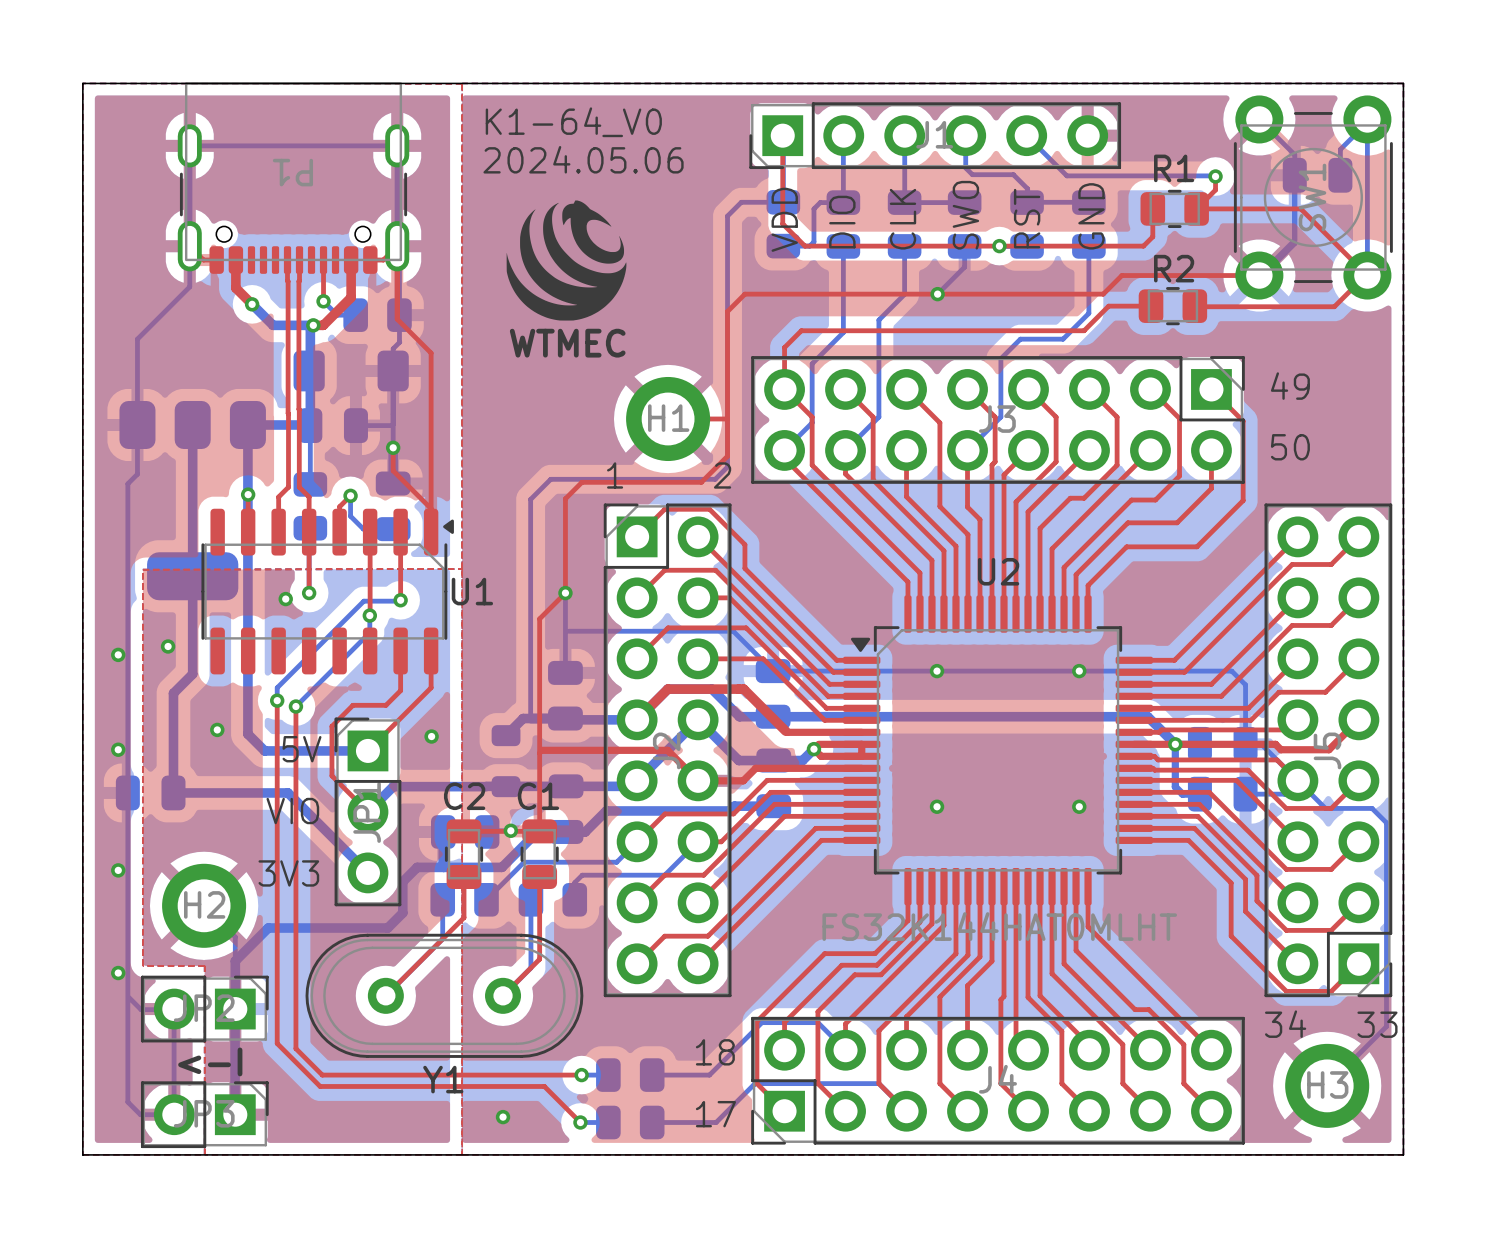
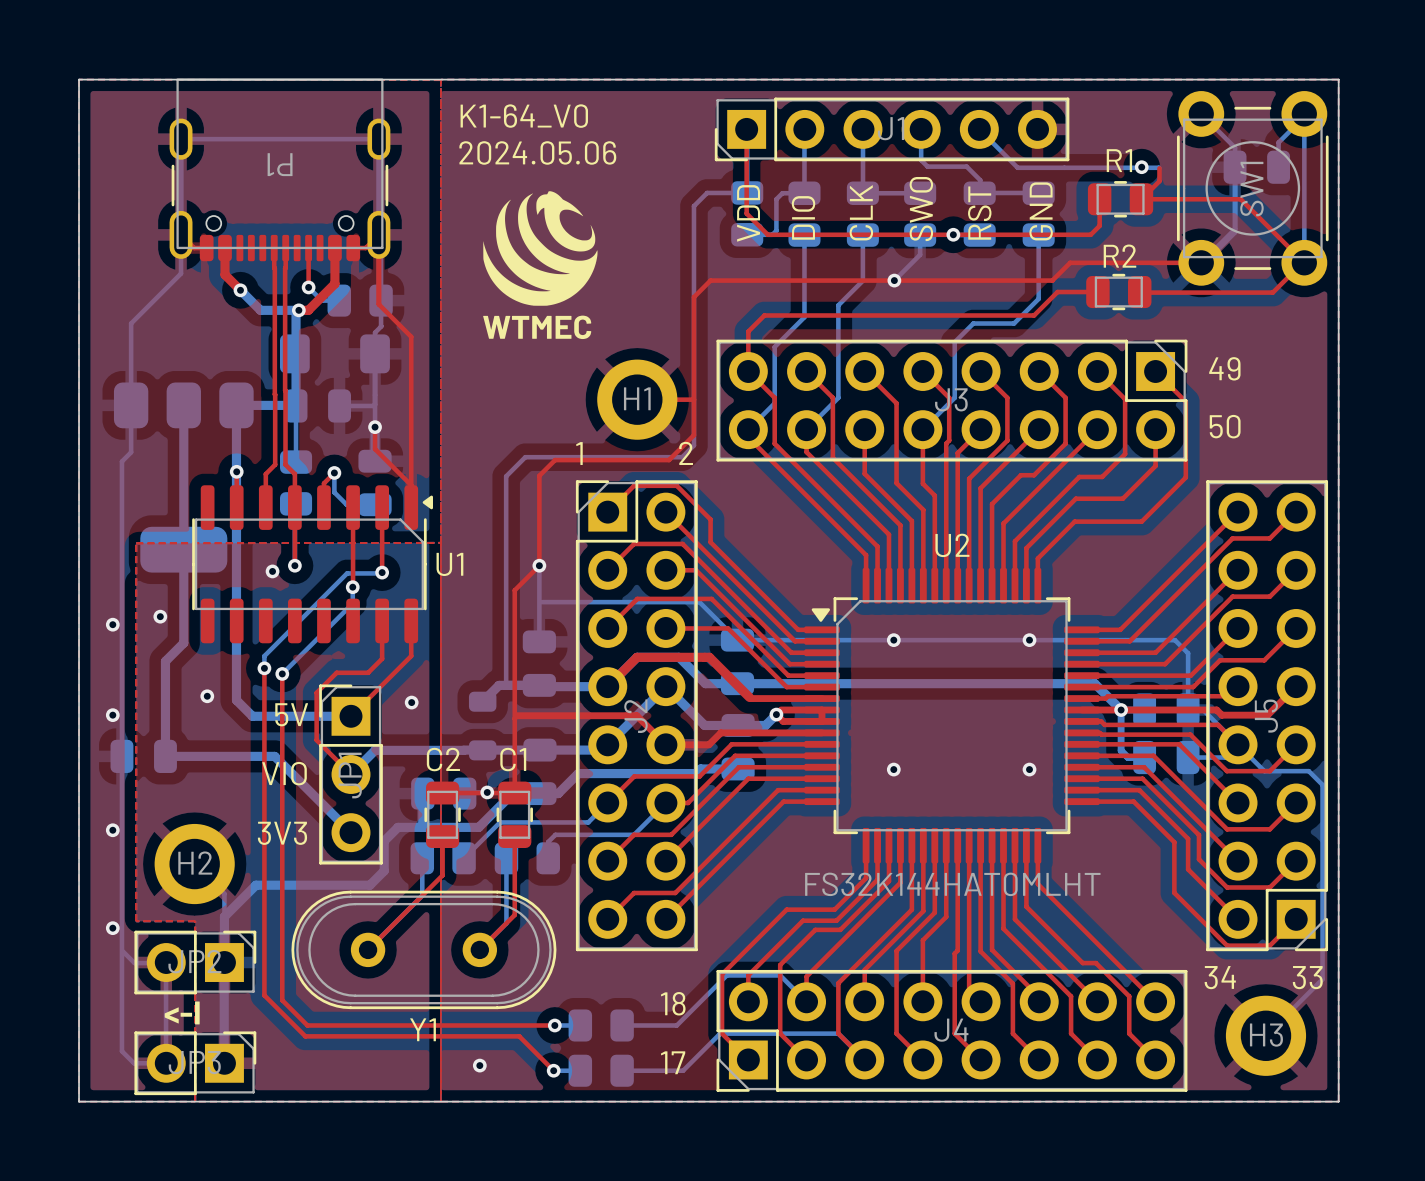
via position: (1215, 176) -> (1141, 167)

